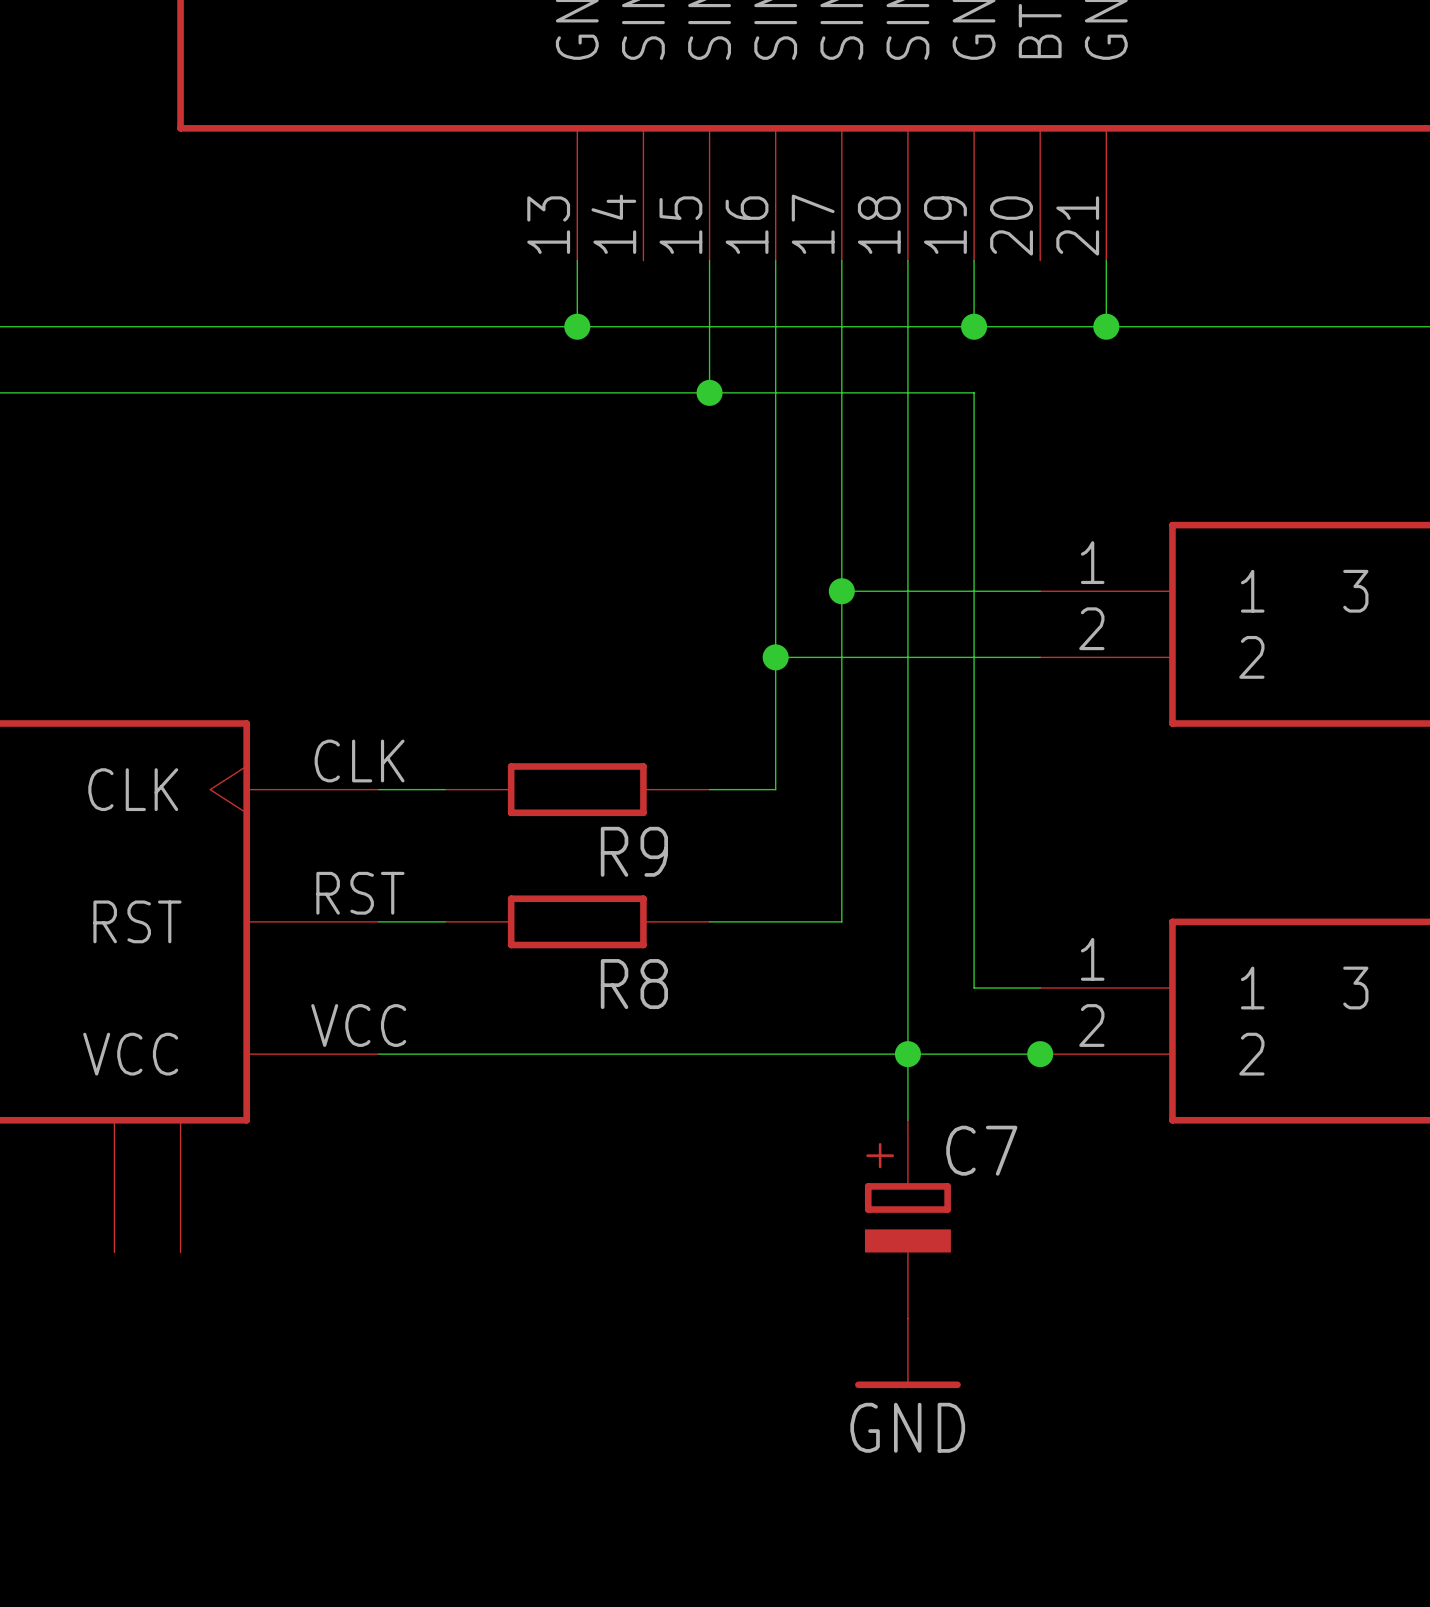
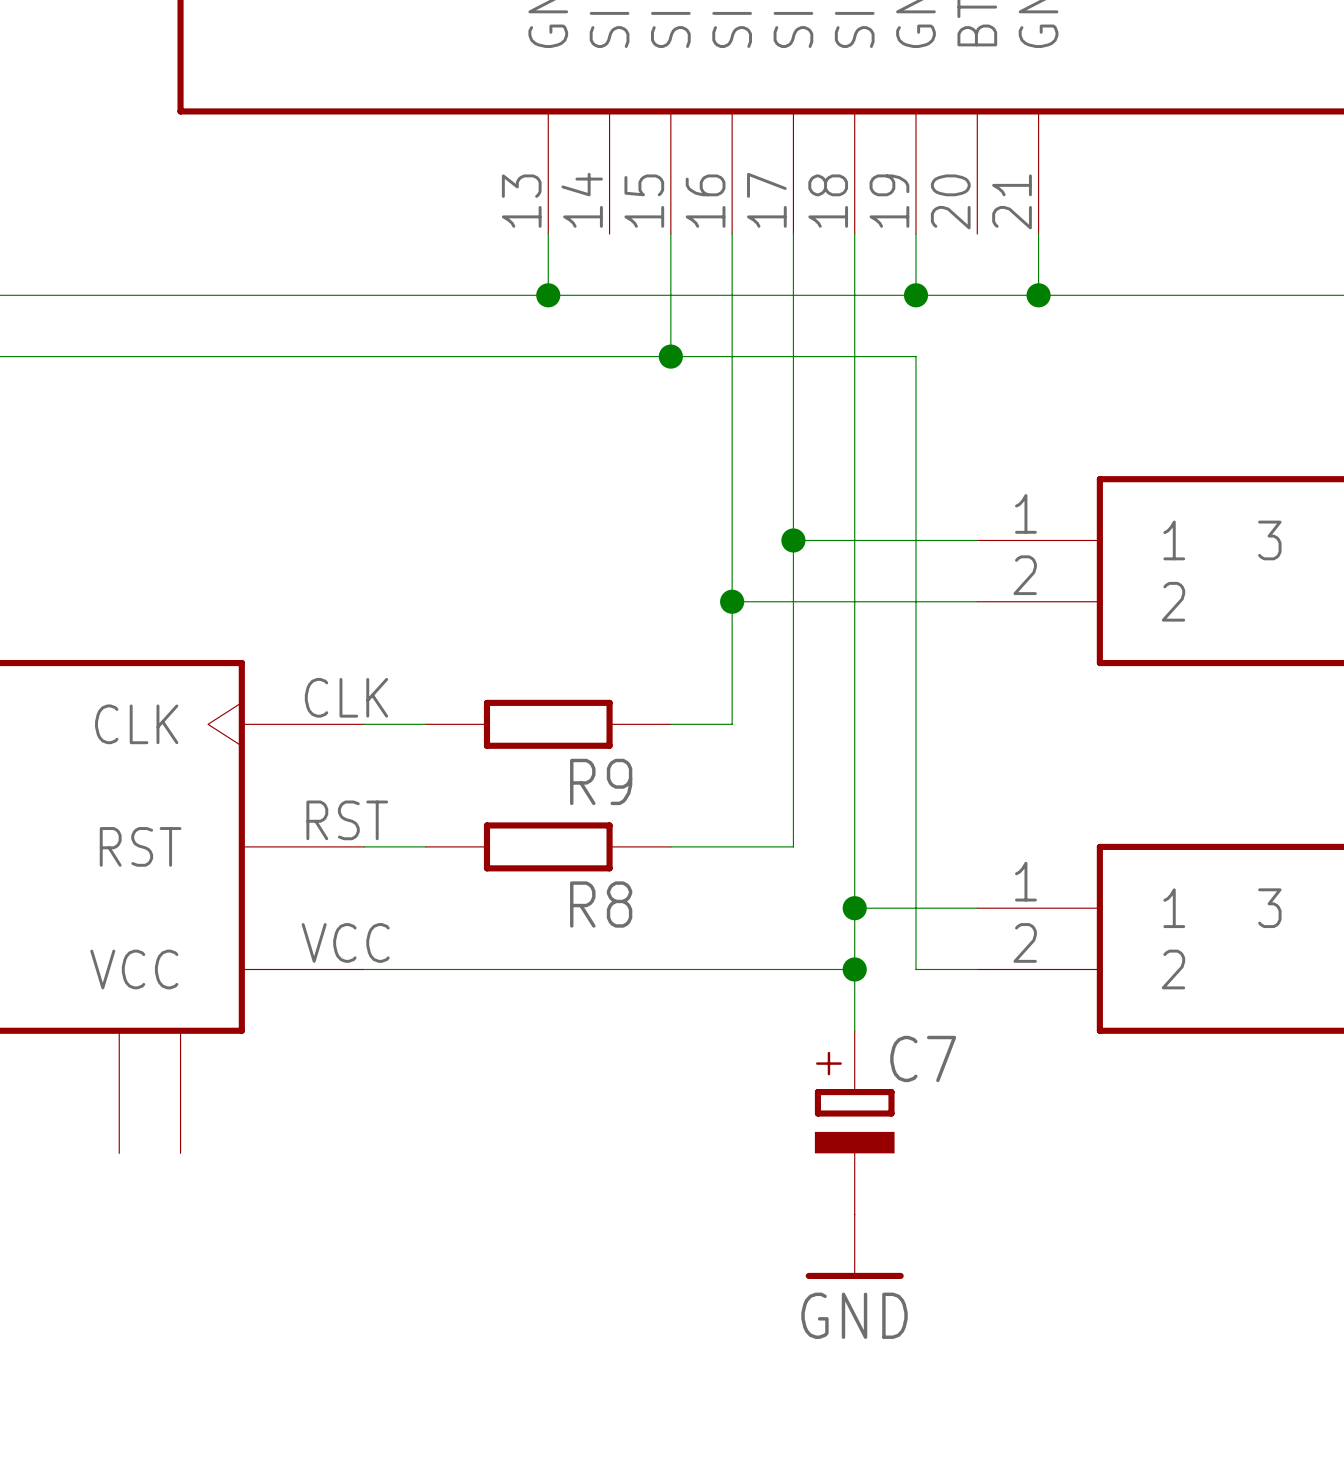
wire: (907, 1054) (974, 1054) -> (854, 908) (916, 908) (916, 969)
junction position: (1040, 1054) -> (854, 908)

